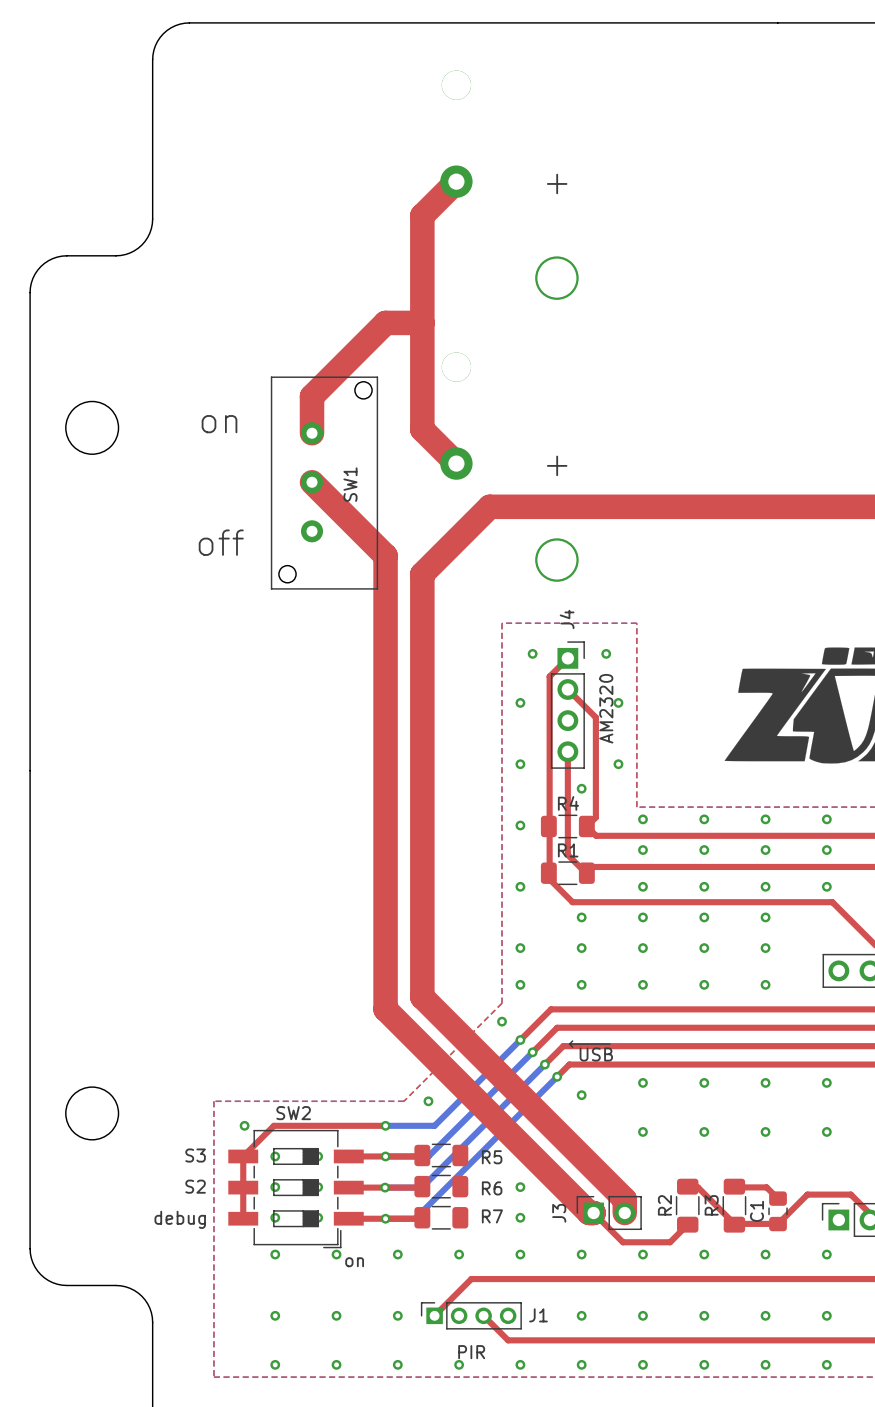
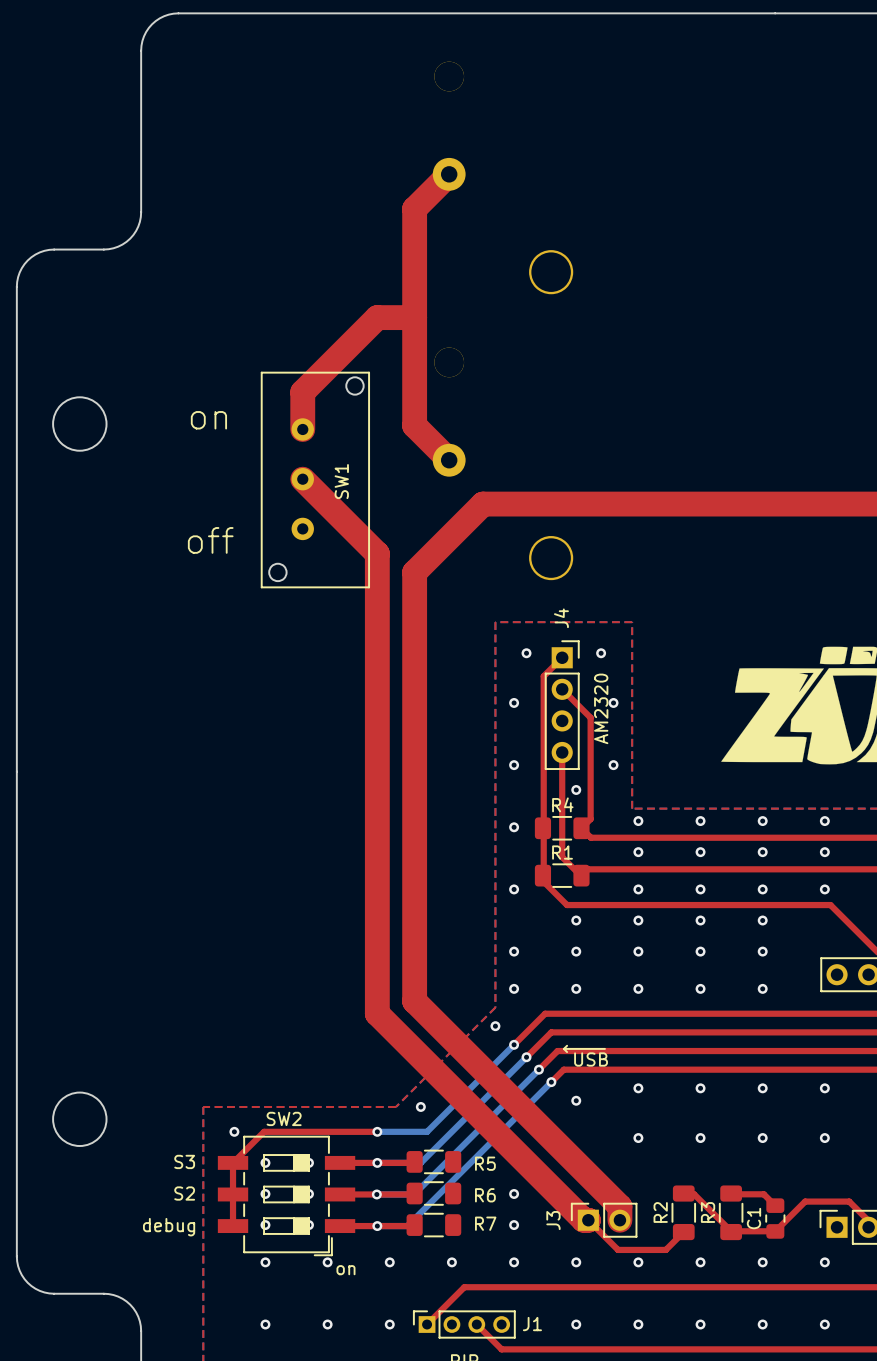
text: + (557, 183) -> none
text: + (557, 465) -> none

